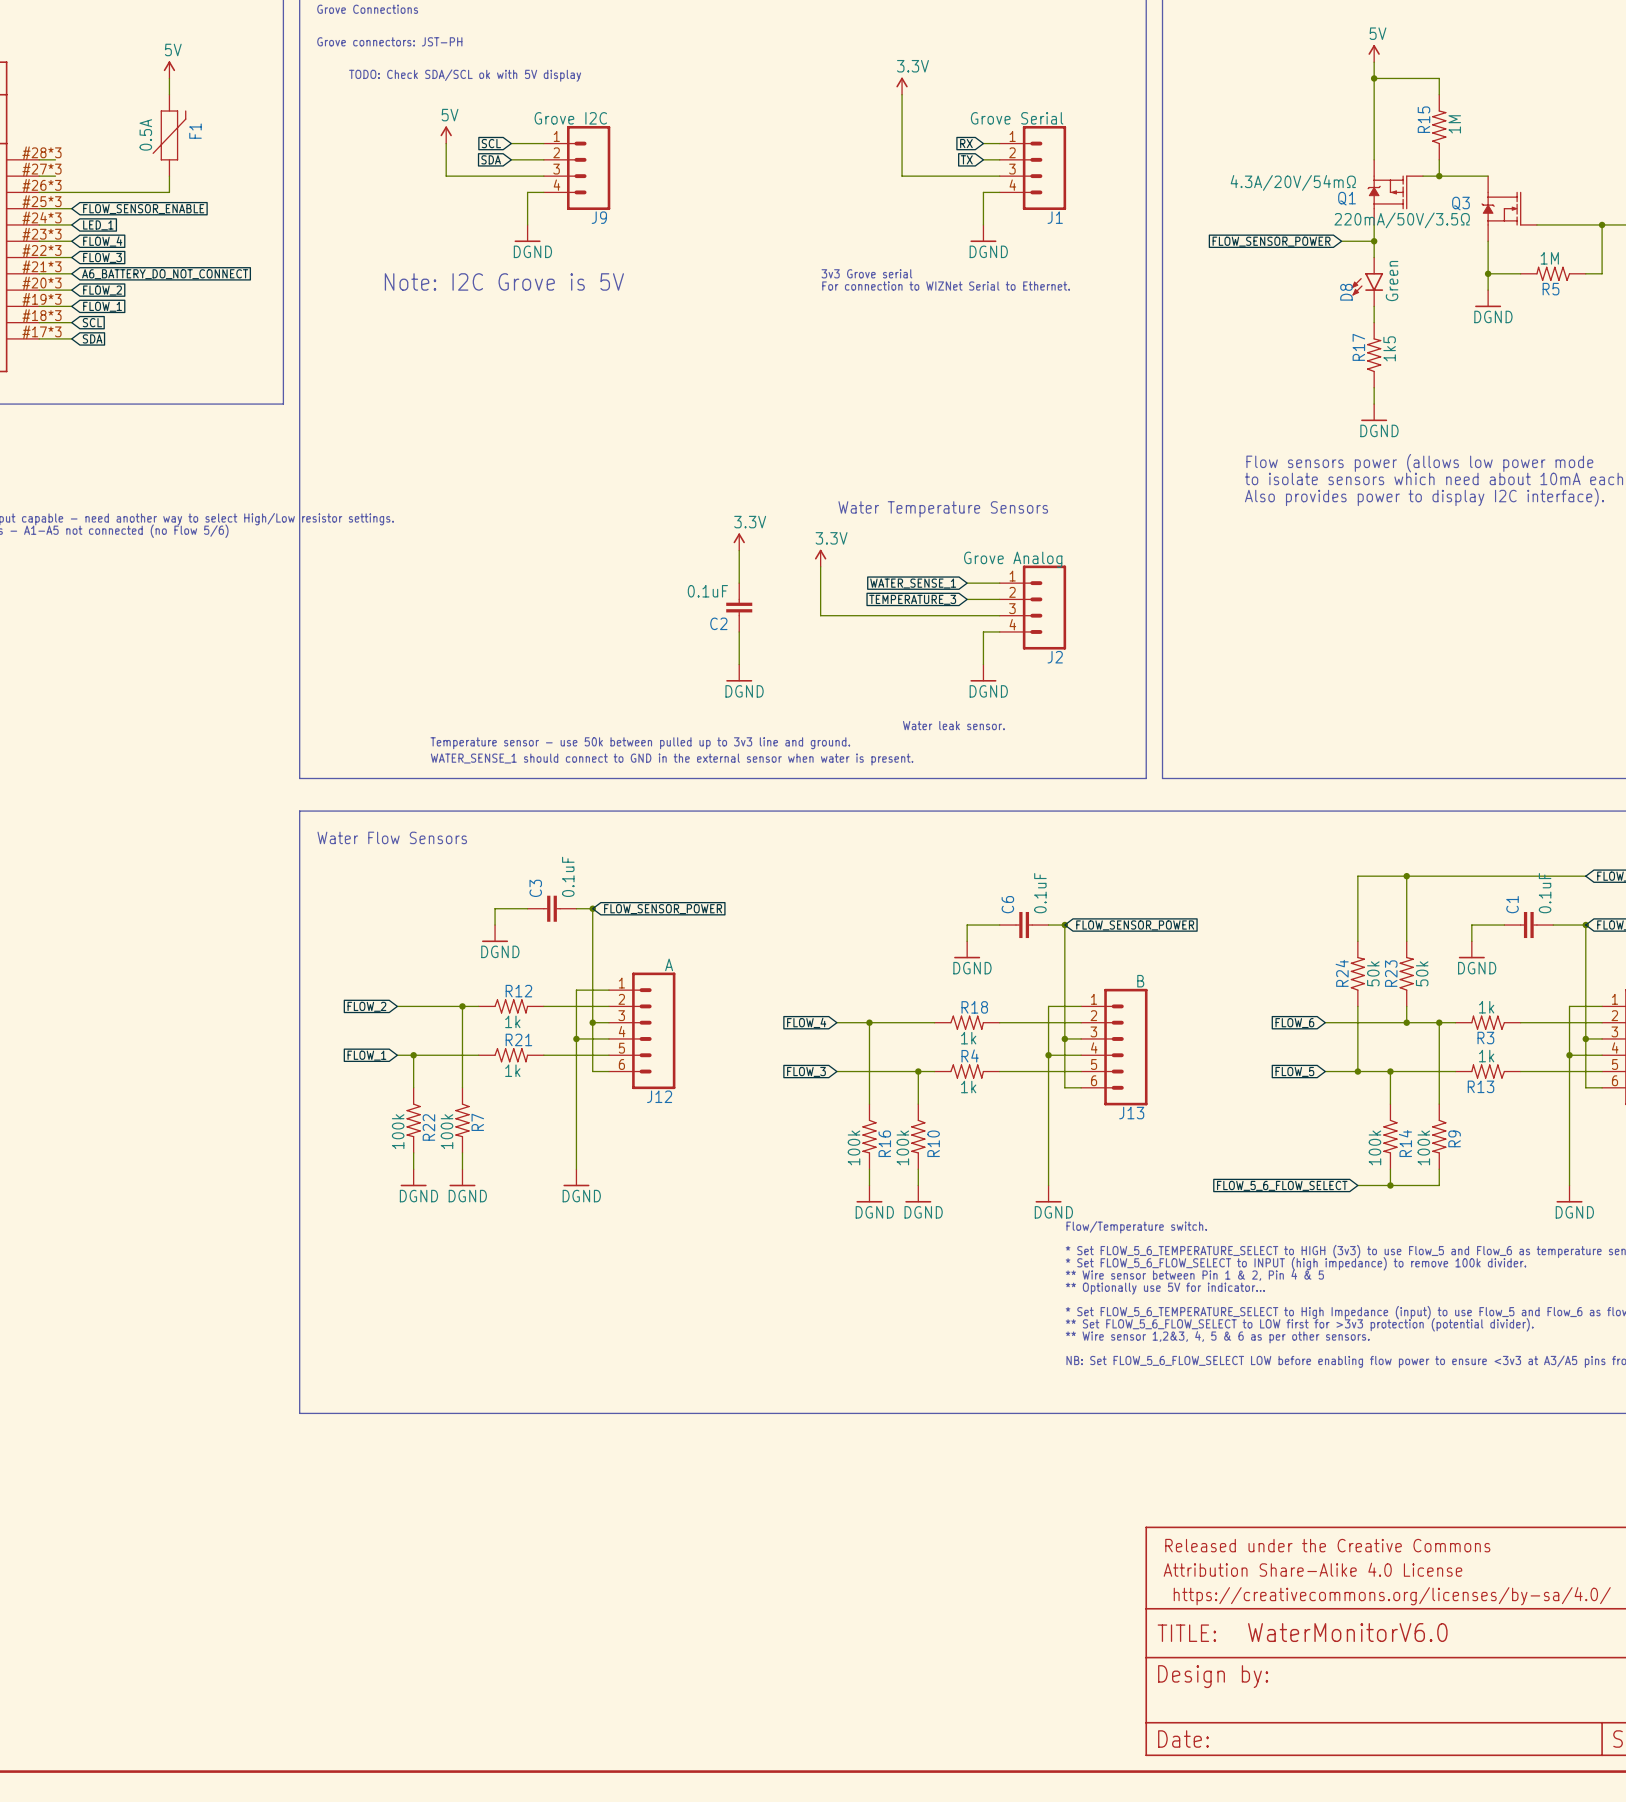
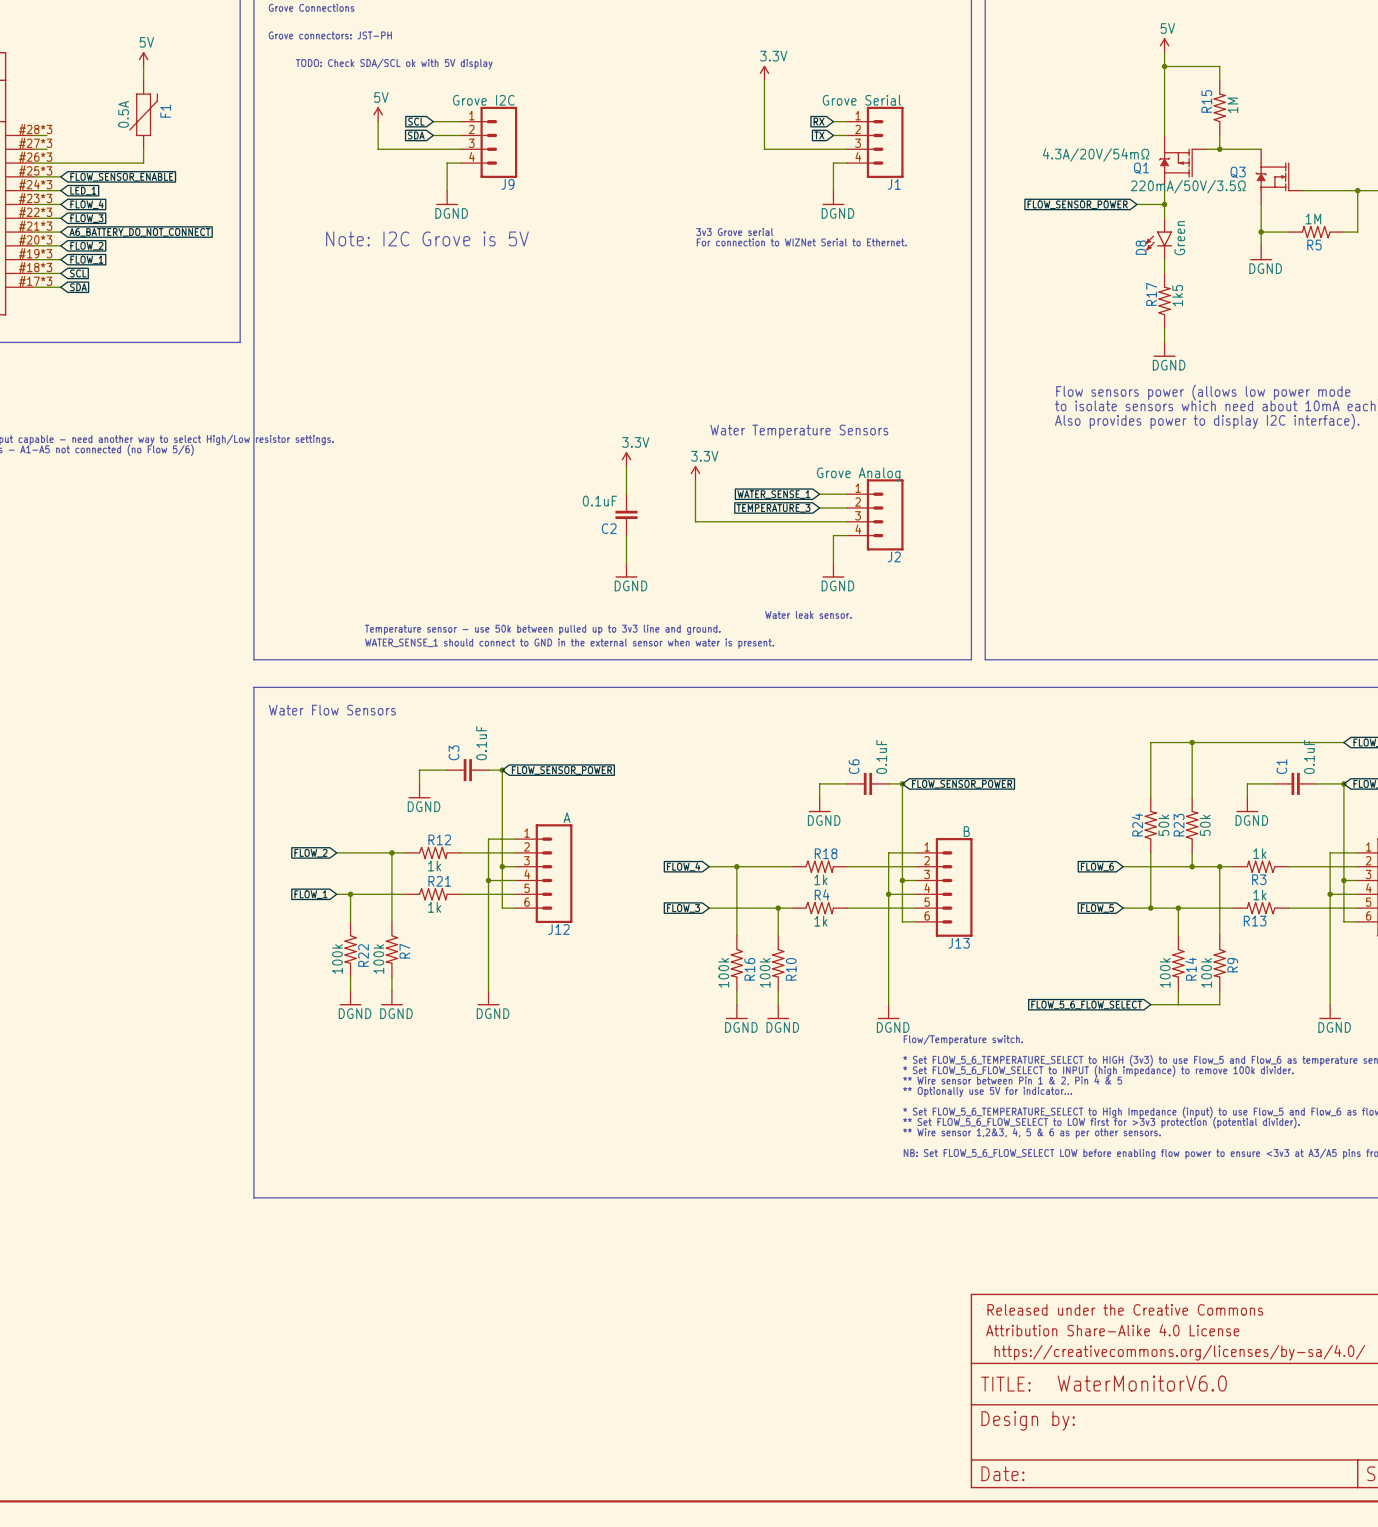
junction: (1390, 1185) -> none

